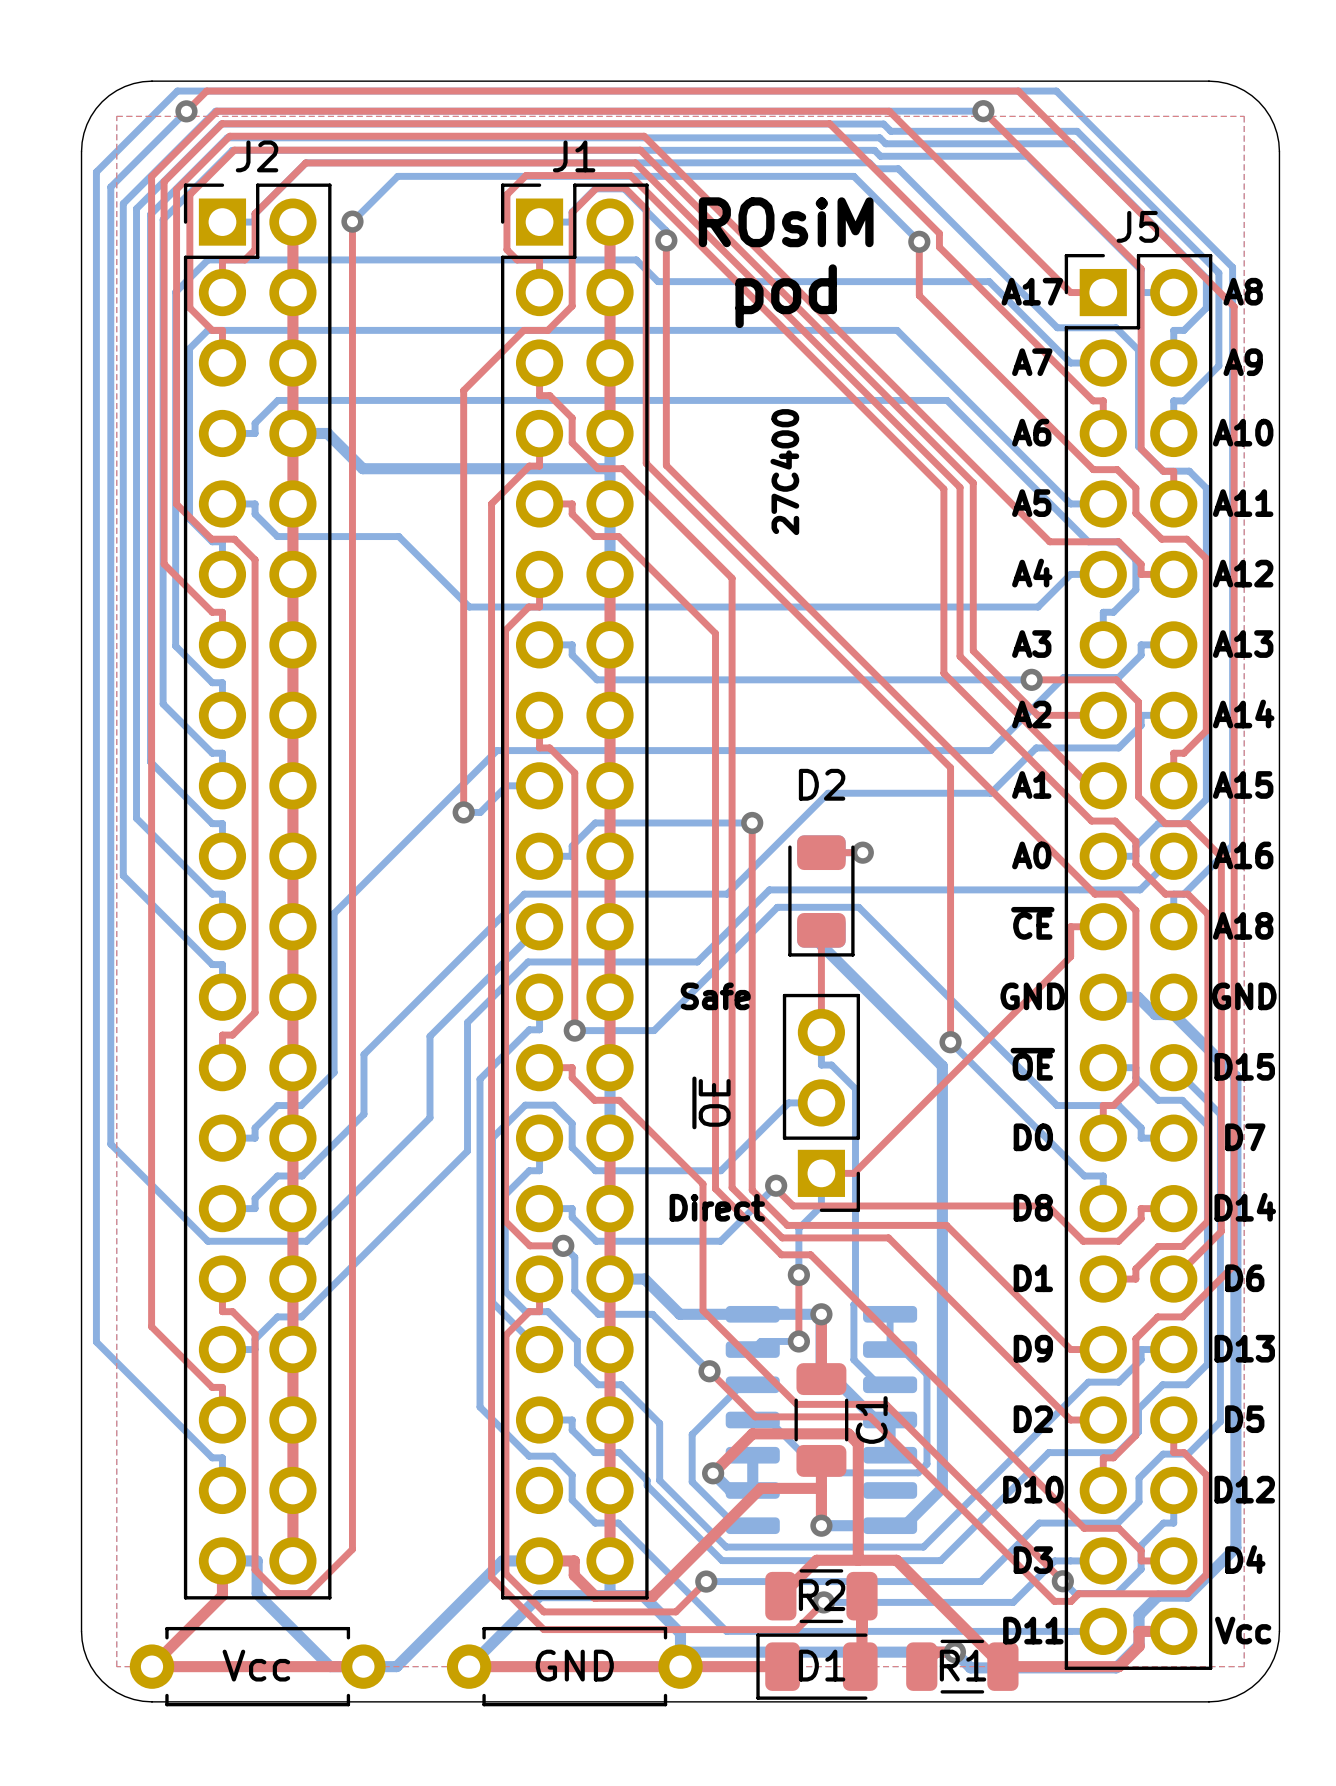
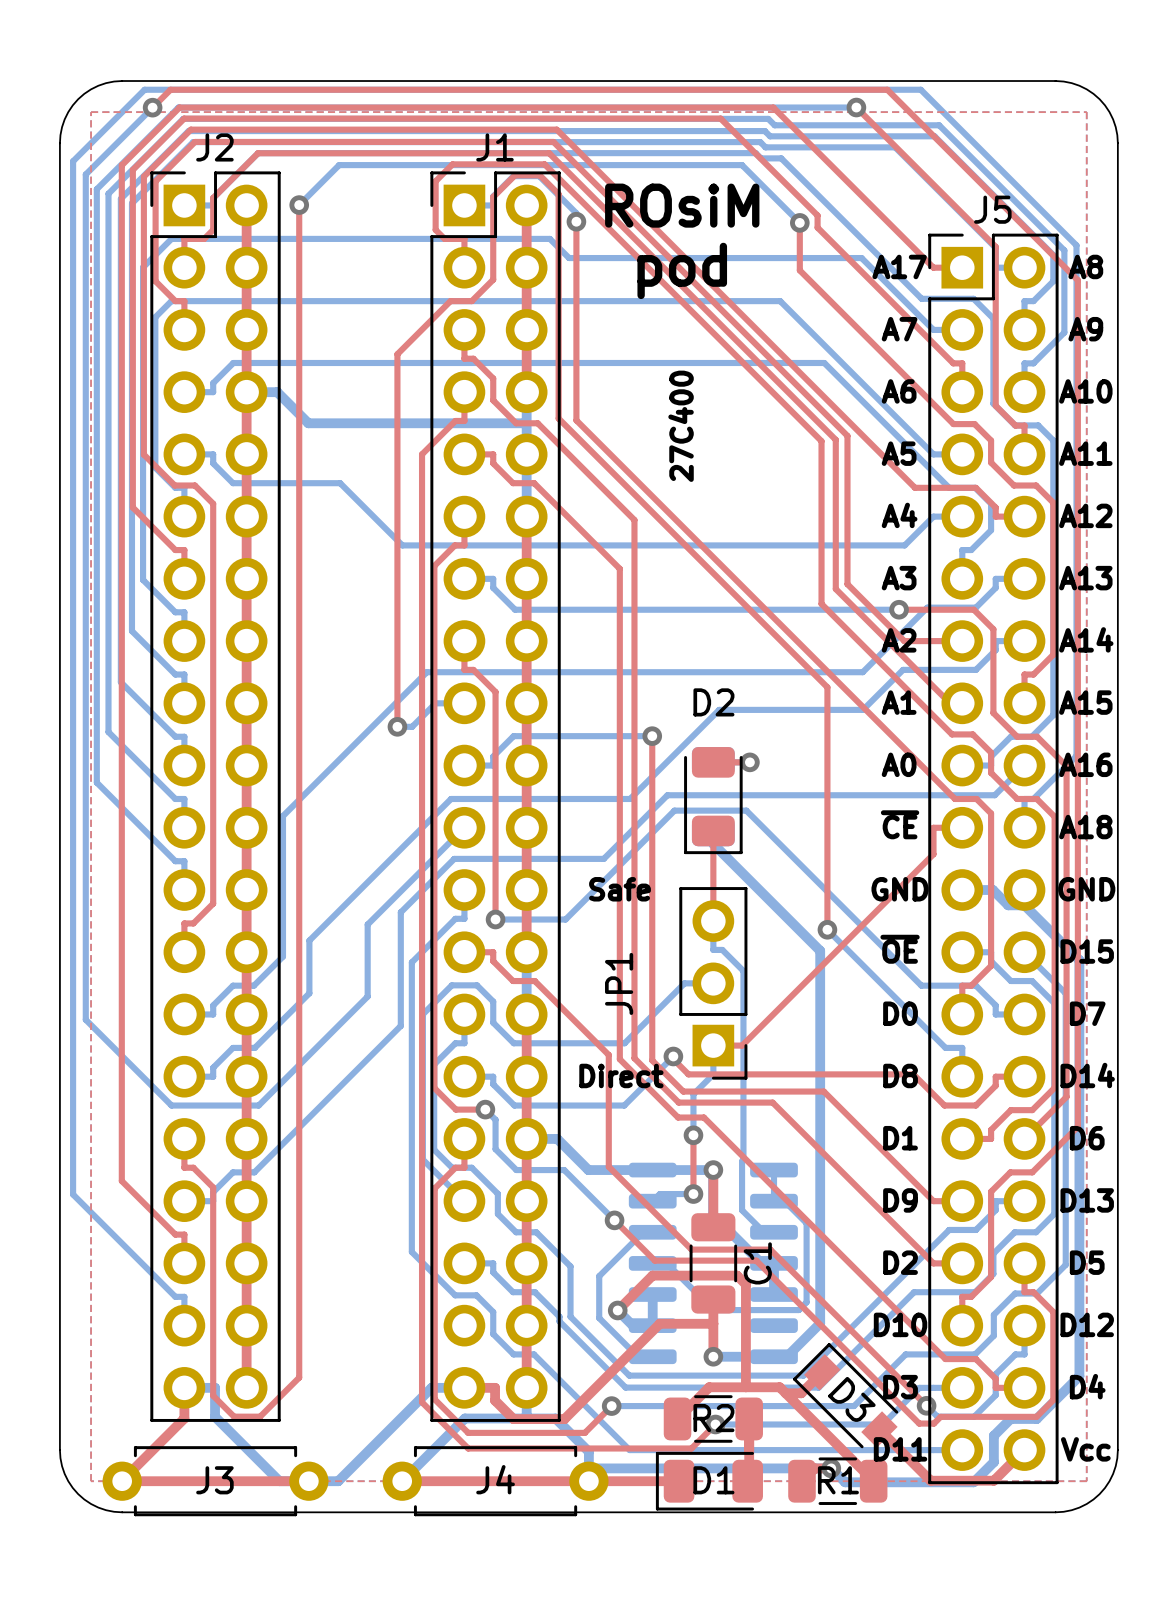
~{OE} name: ~{OE} (711, 1102) -> JP1 (619, 983)
top track: none -> (822, 1372) (801, 1393) (785, 1393)
D3: none -> (845, 1395)
top track: (1173, 1631) (1139, 1631) (1139, 1646) (1119, 1666) (1002, 1666) -> (1024, 1450) (993, 1480) (930, 1480) (879, 1429)
Vcc name: Vcc (256, 1665) -> J3 (214, 1480)
GND name: GND (574, 1665) -> J4 (495, 1479)

